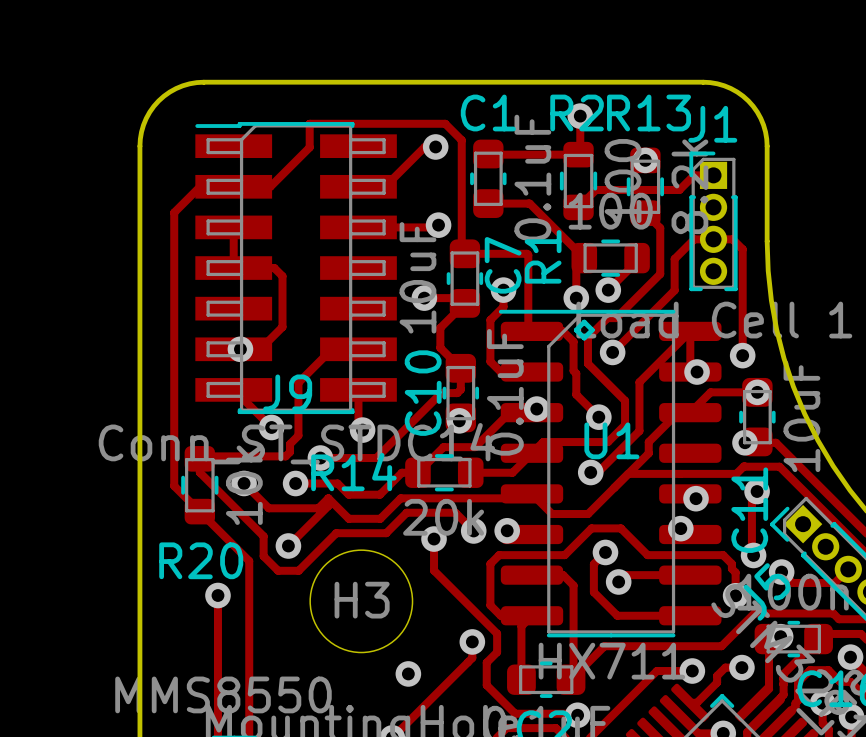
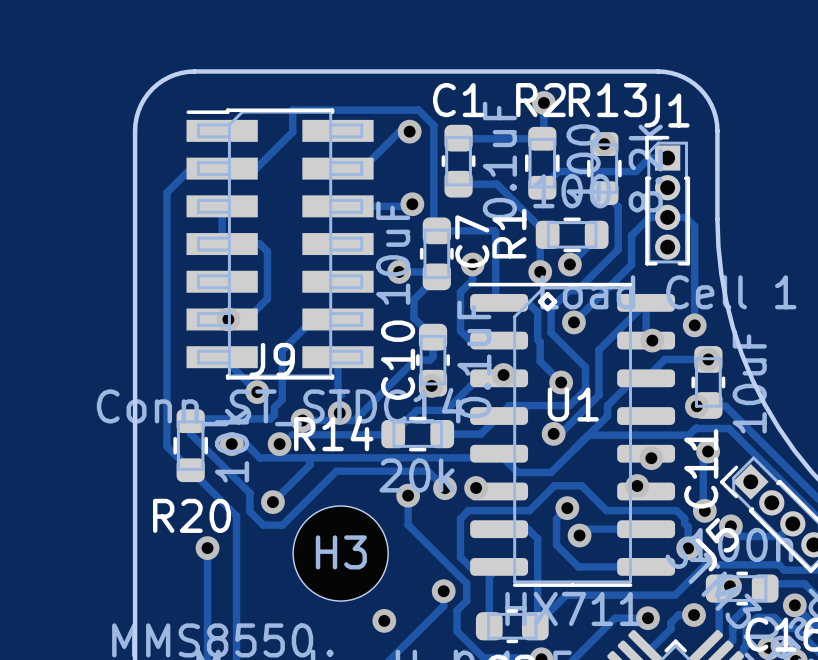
via position: (362, 430) -> (339, 413)
track: (417, 472) (401, 472) (379, 494) (348, 494) (337, 483) (295, 483) -> (393, 434) (291, 434)
track: (244, 483) (268, 508) (318, 508) (328, 498) (348, 518) (380, 518) (400, 498) -> (242, 440) (259, 457) (377, 457)
track: (406, 512) (386, 533) (336, 533) -> (382, 471) (336, 471) (317, 490)

